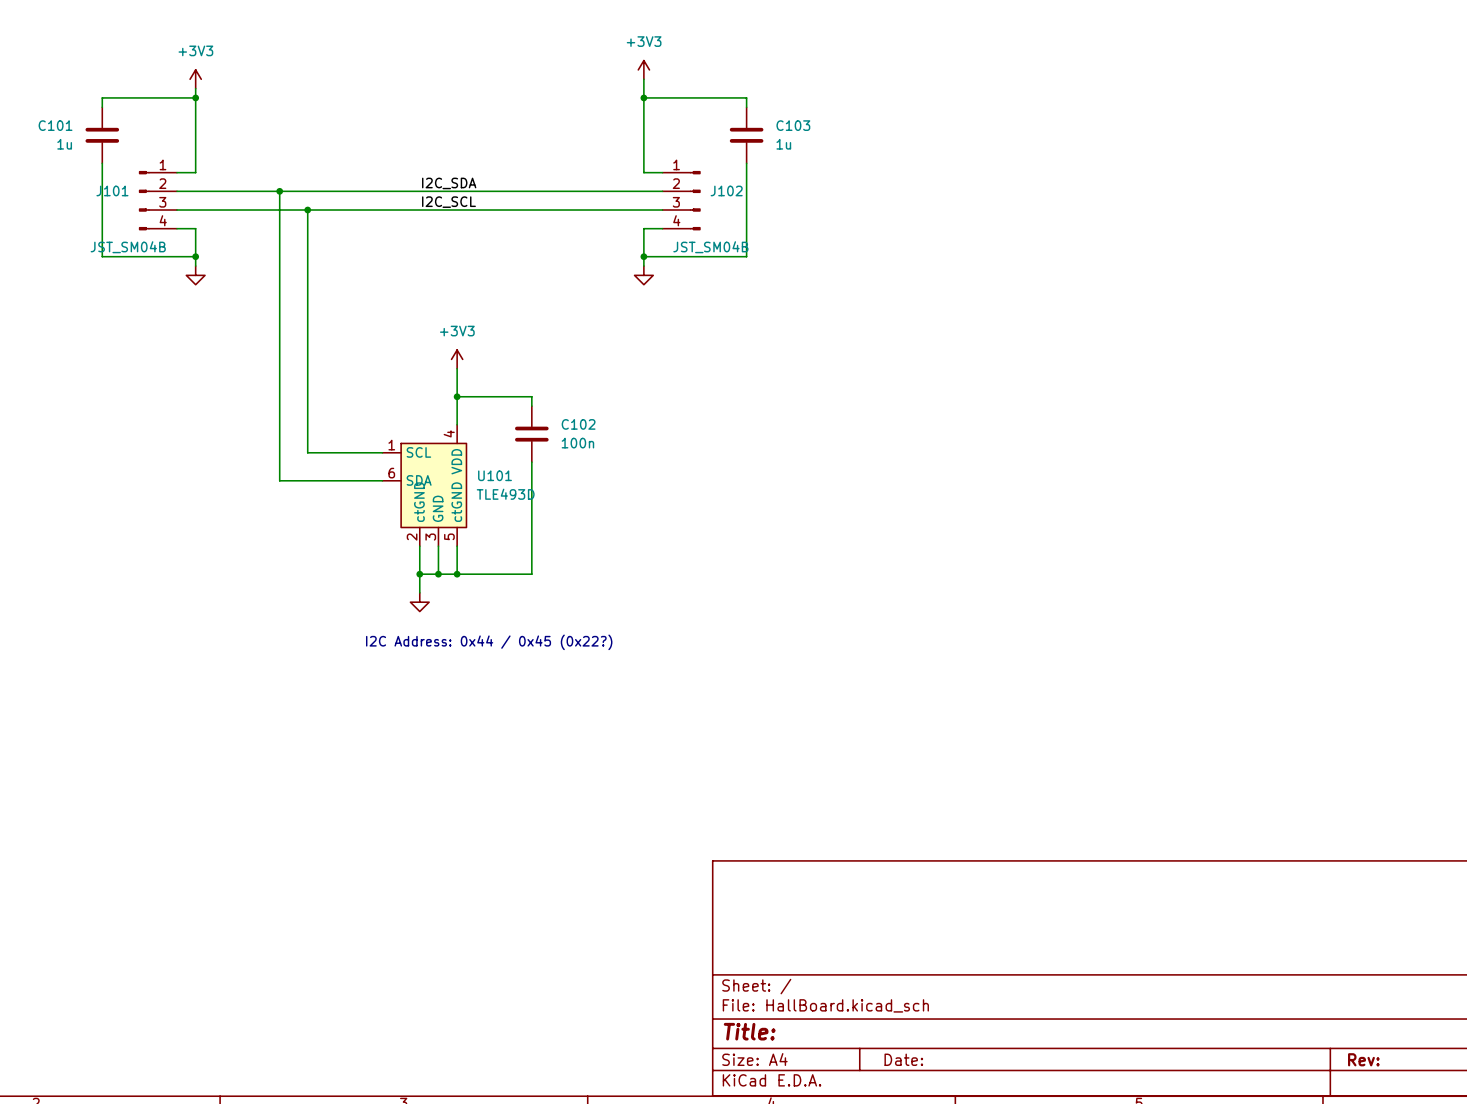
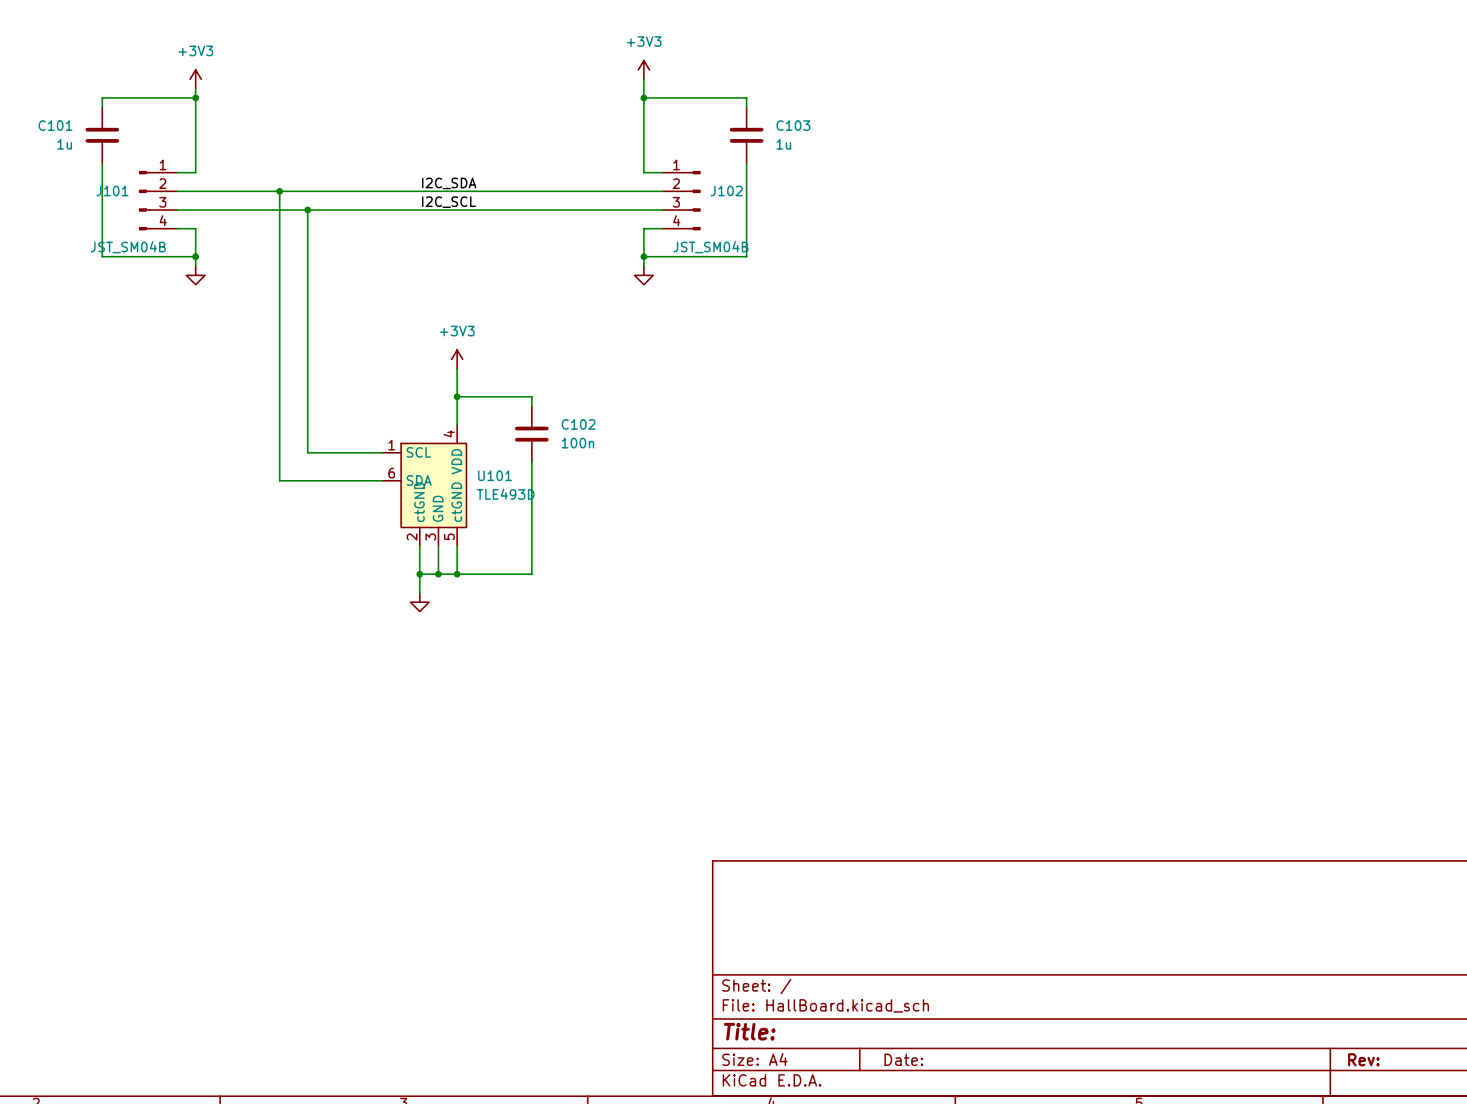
text: I2C Address: 0x44 / 0x45 (0x22?) (489, 642) -> none

